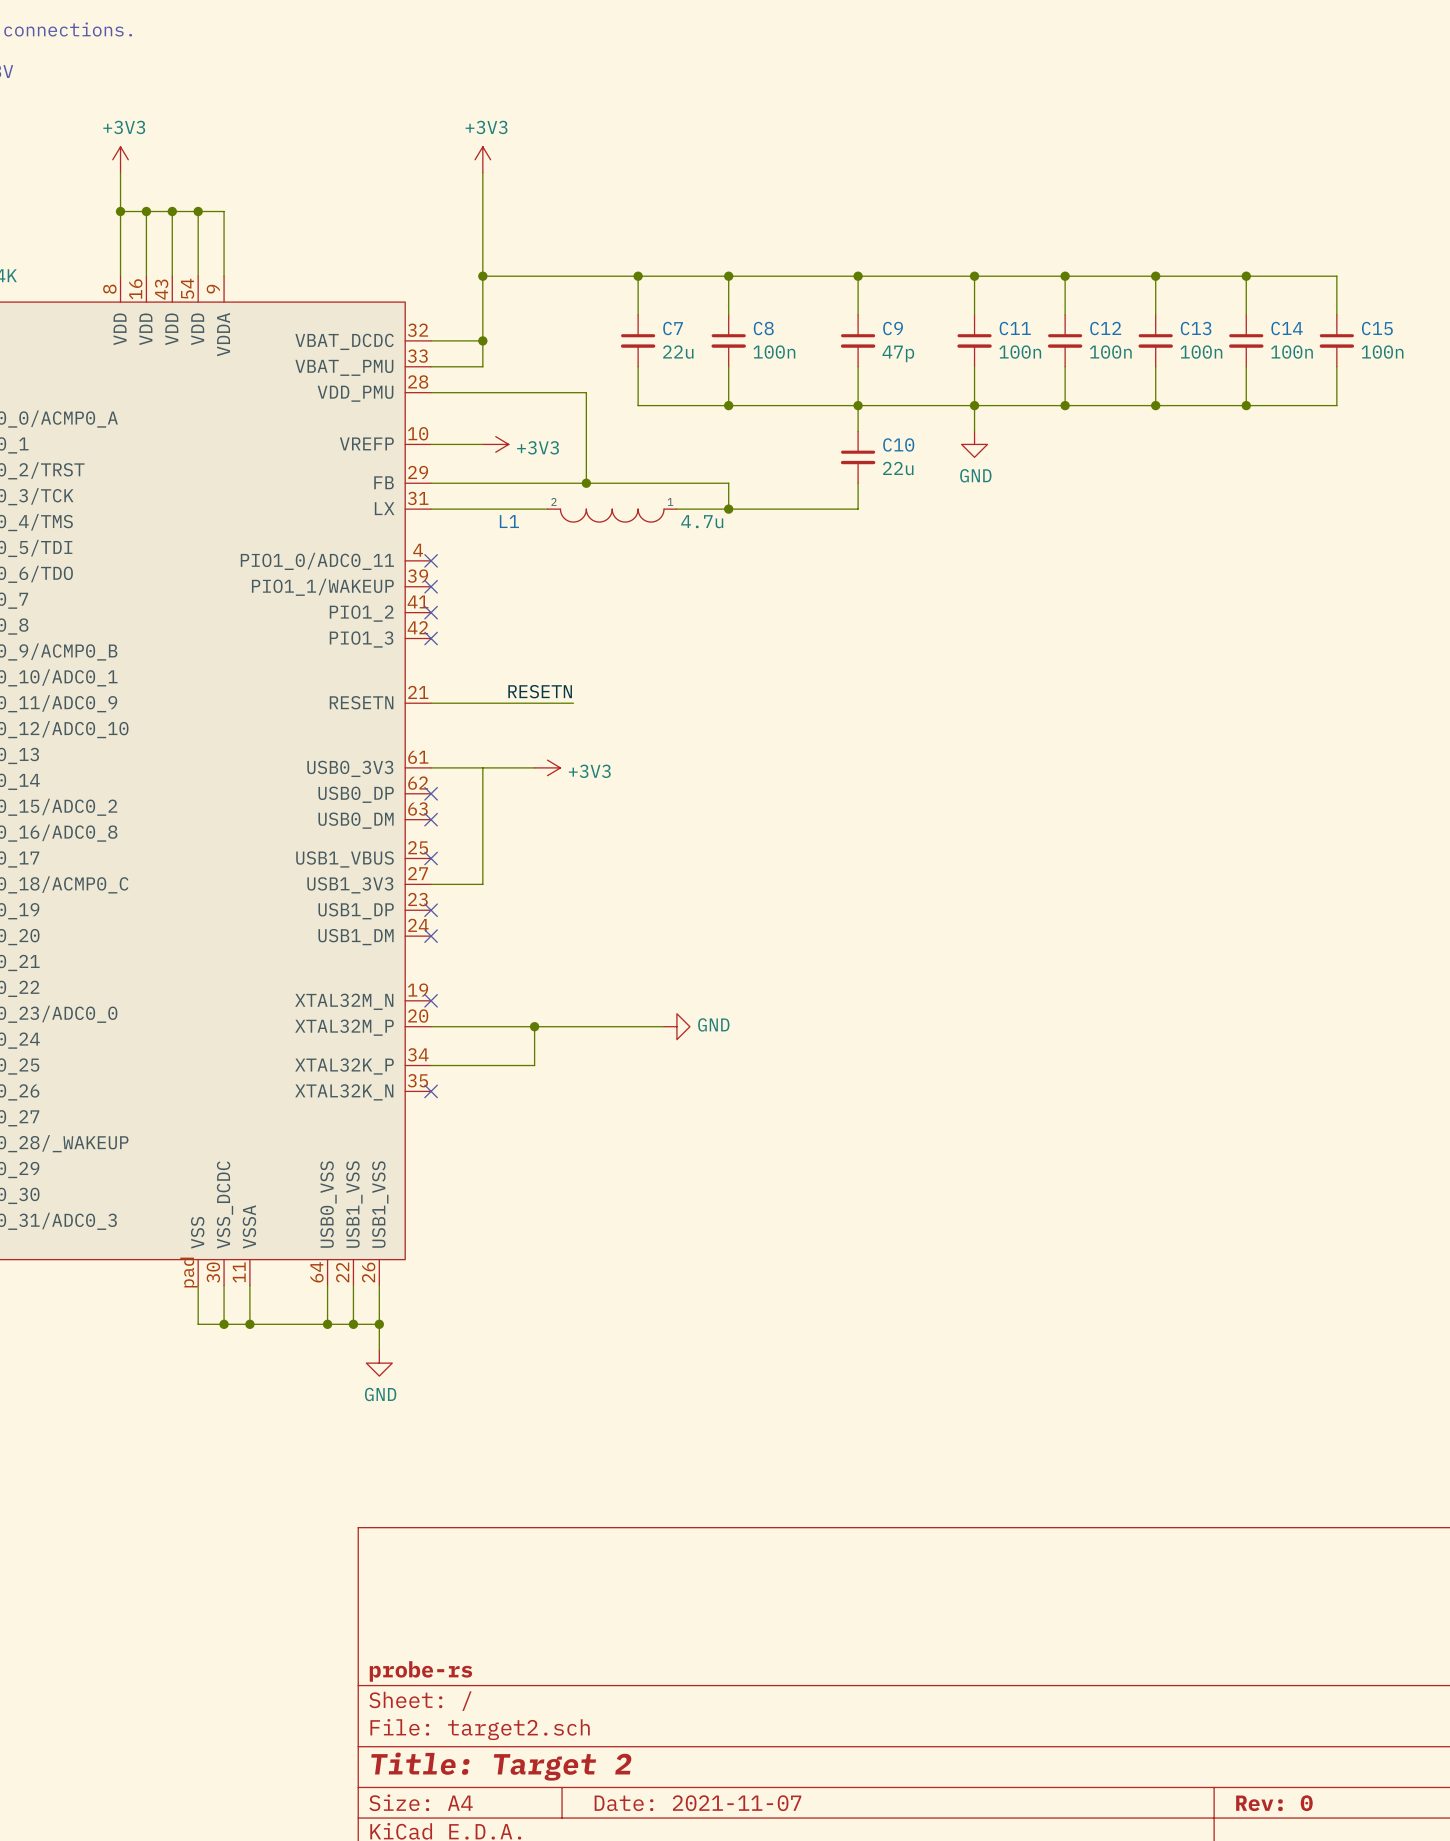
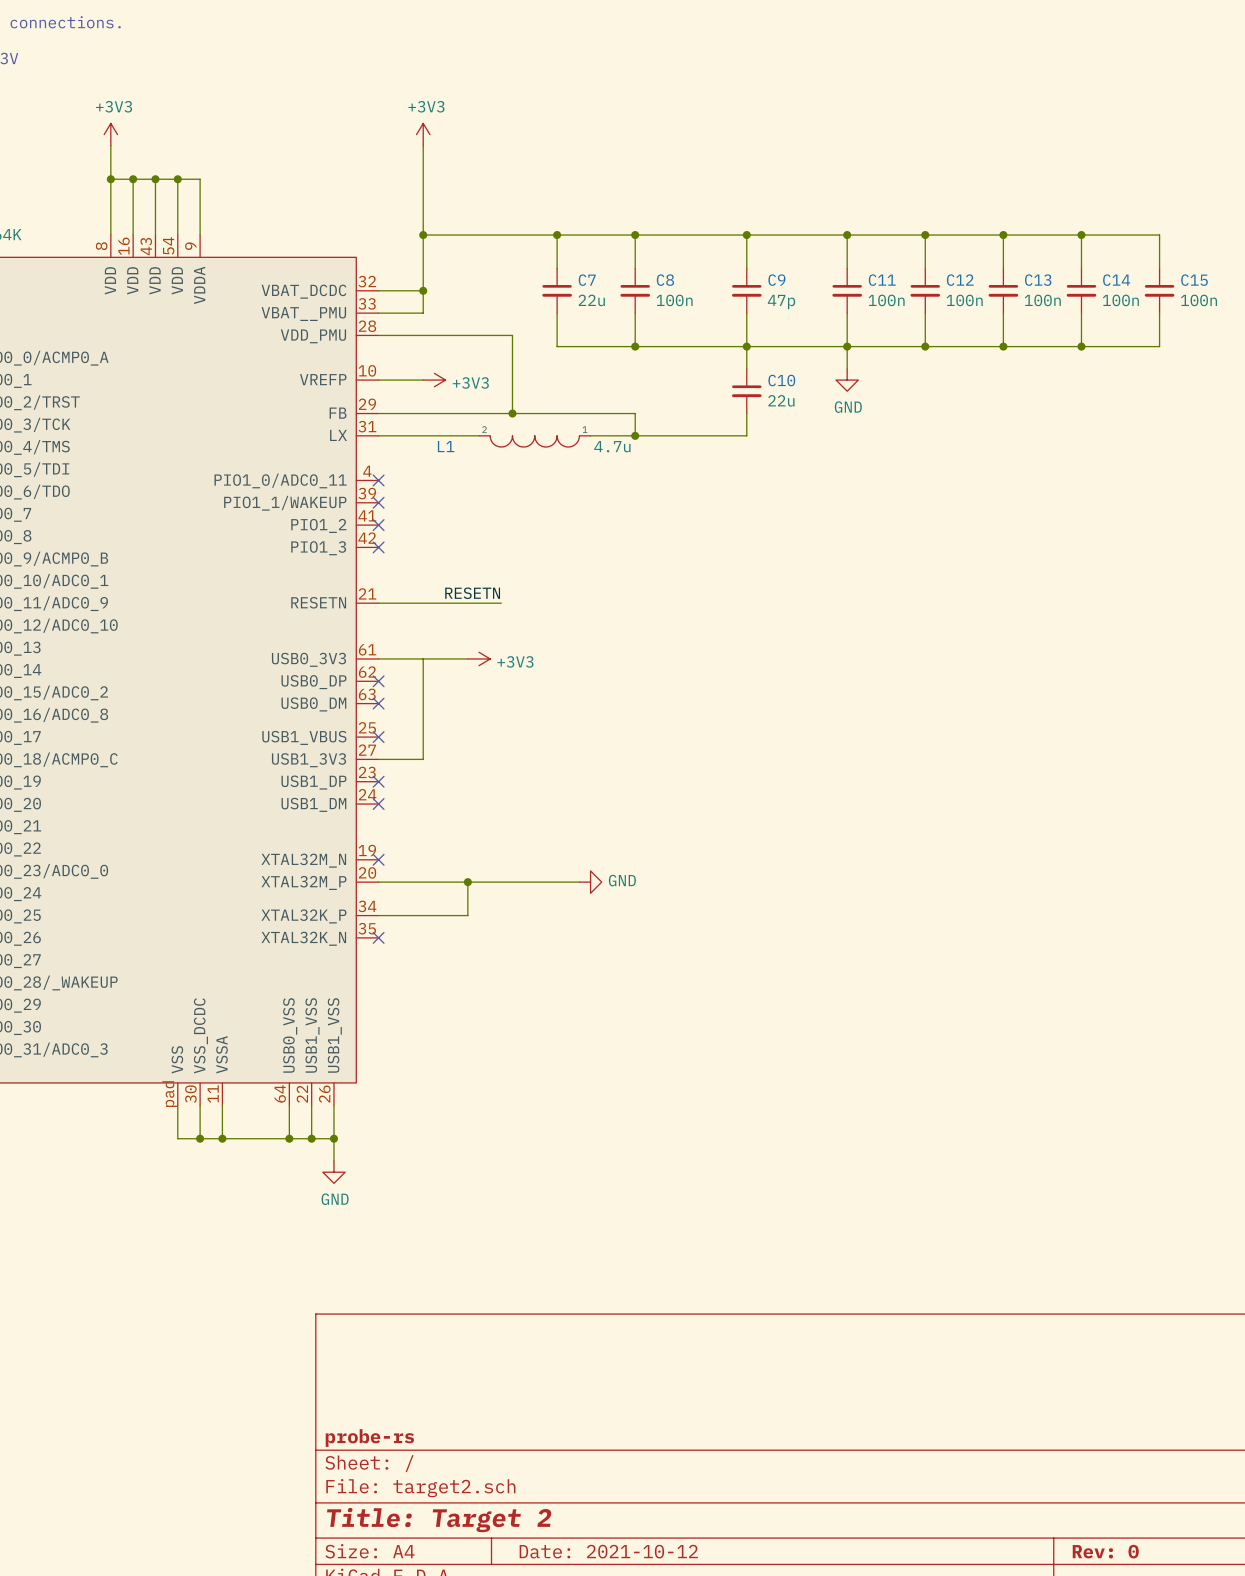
title block: Date: 2021-11-07 (697, 1803) -> Date: 2021-10-12 (608, 1551)

